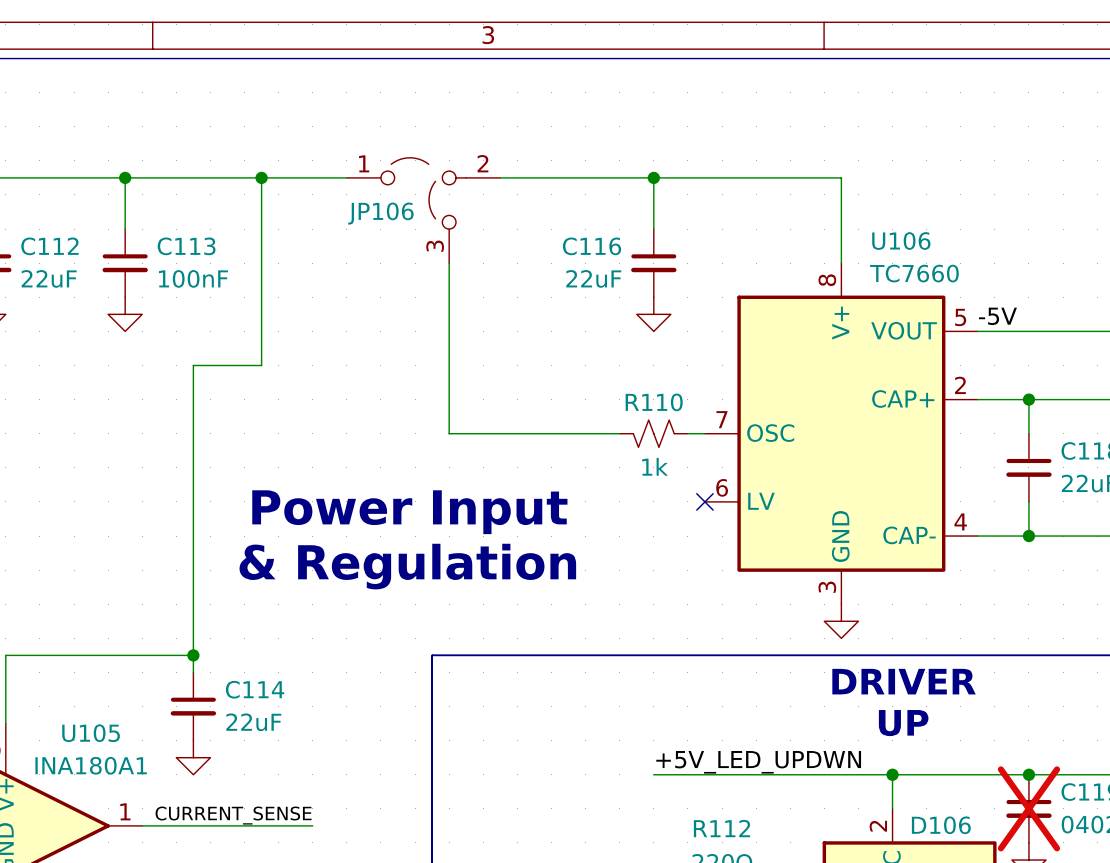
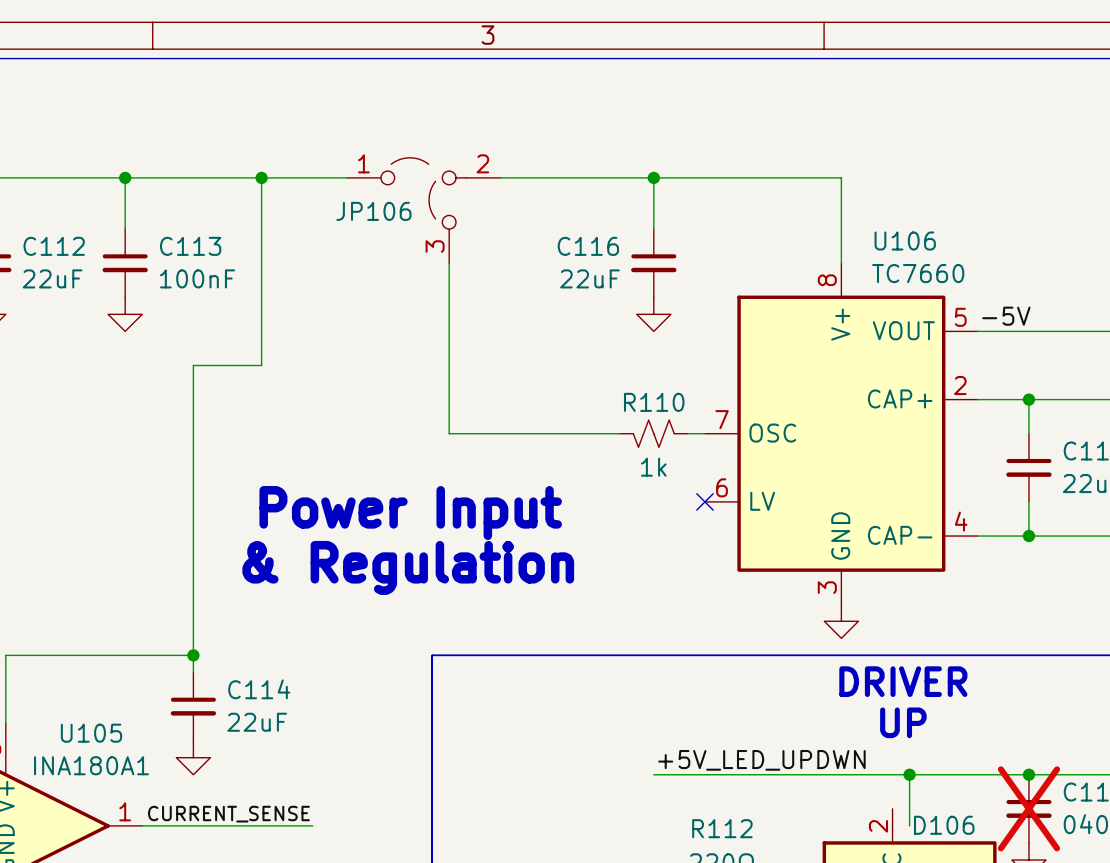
wire: (892, 774) (892, 808) -> none
junction position: (892, 774) -> (909, 774)
wire: none -> (909, 774) (909, 825)

